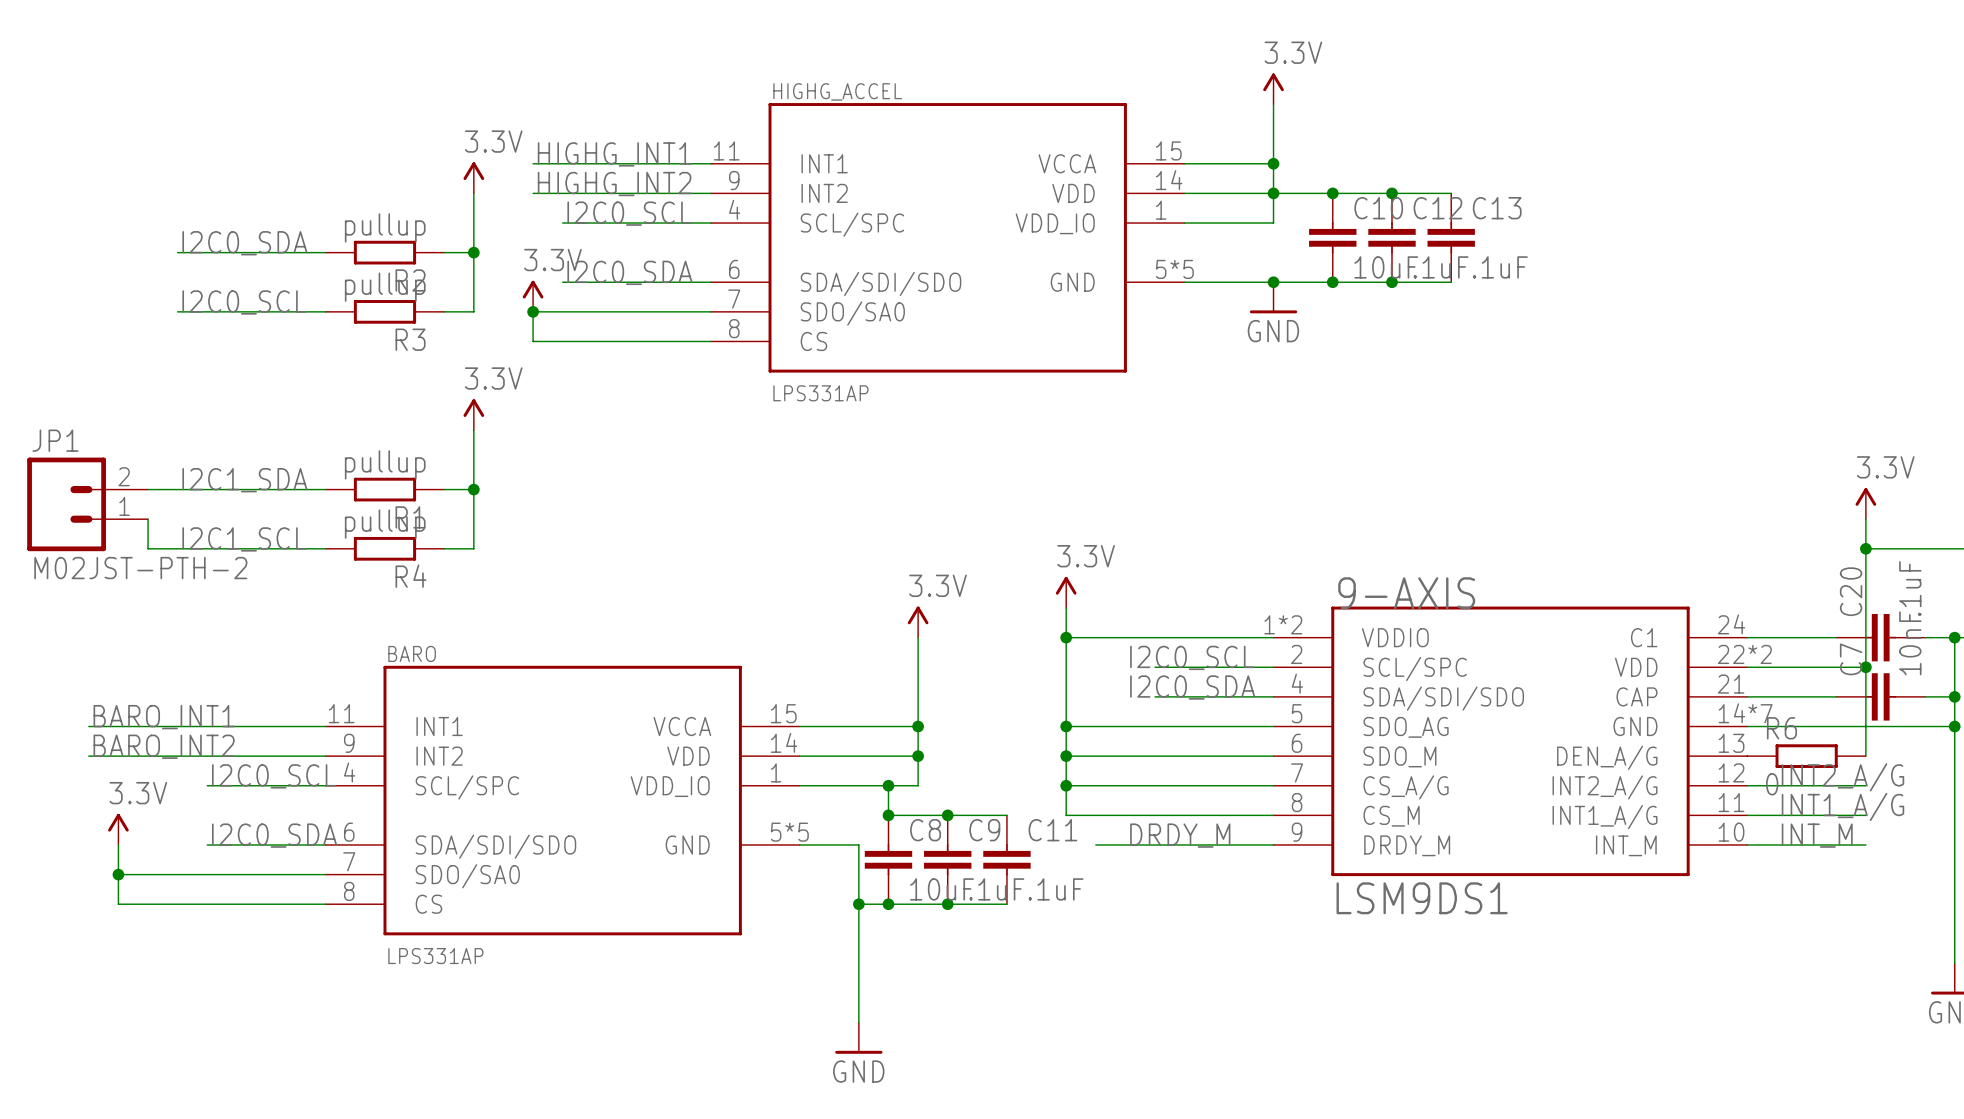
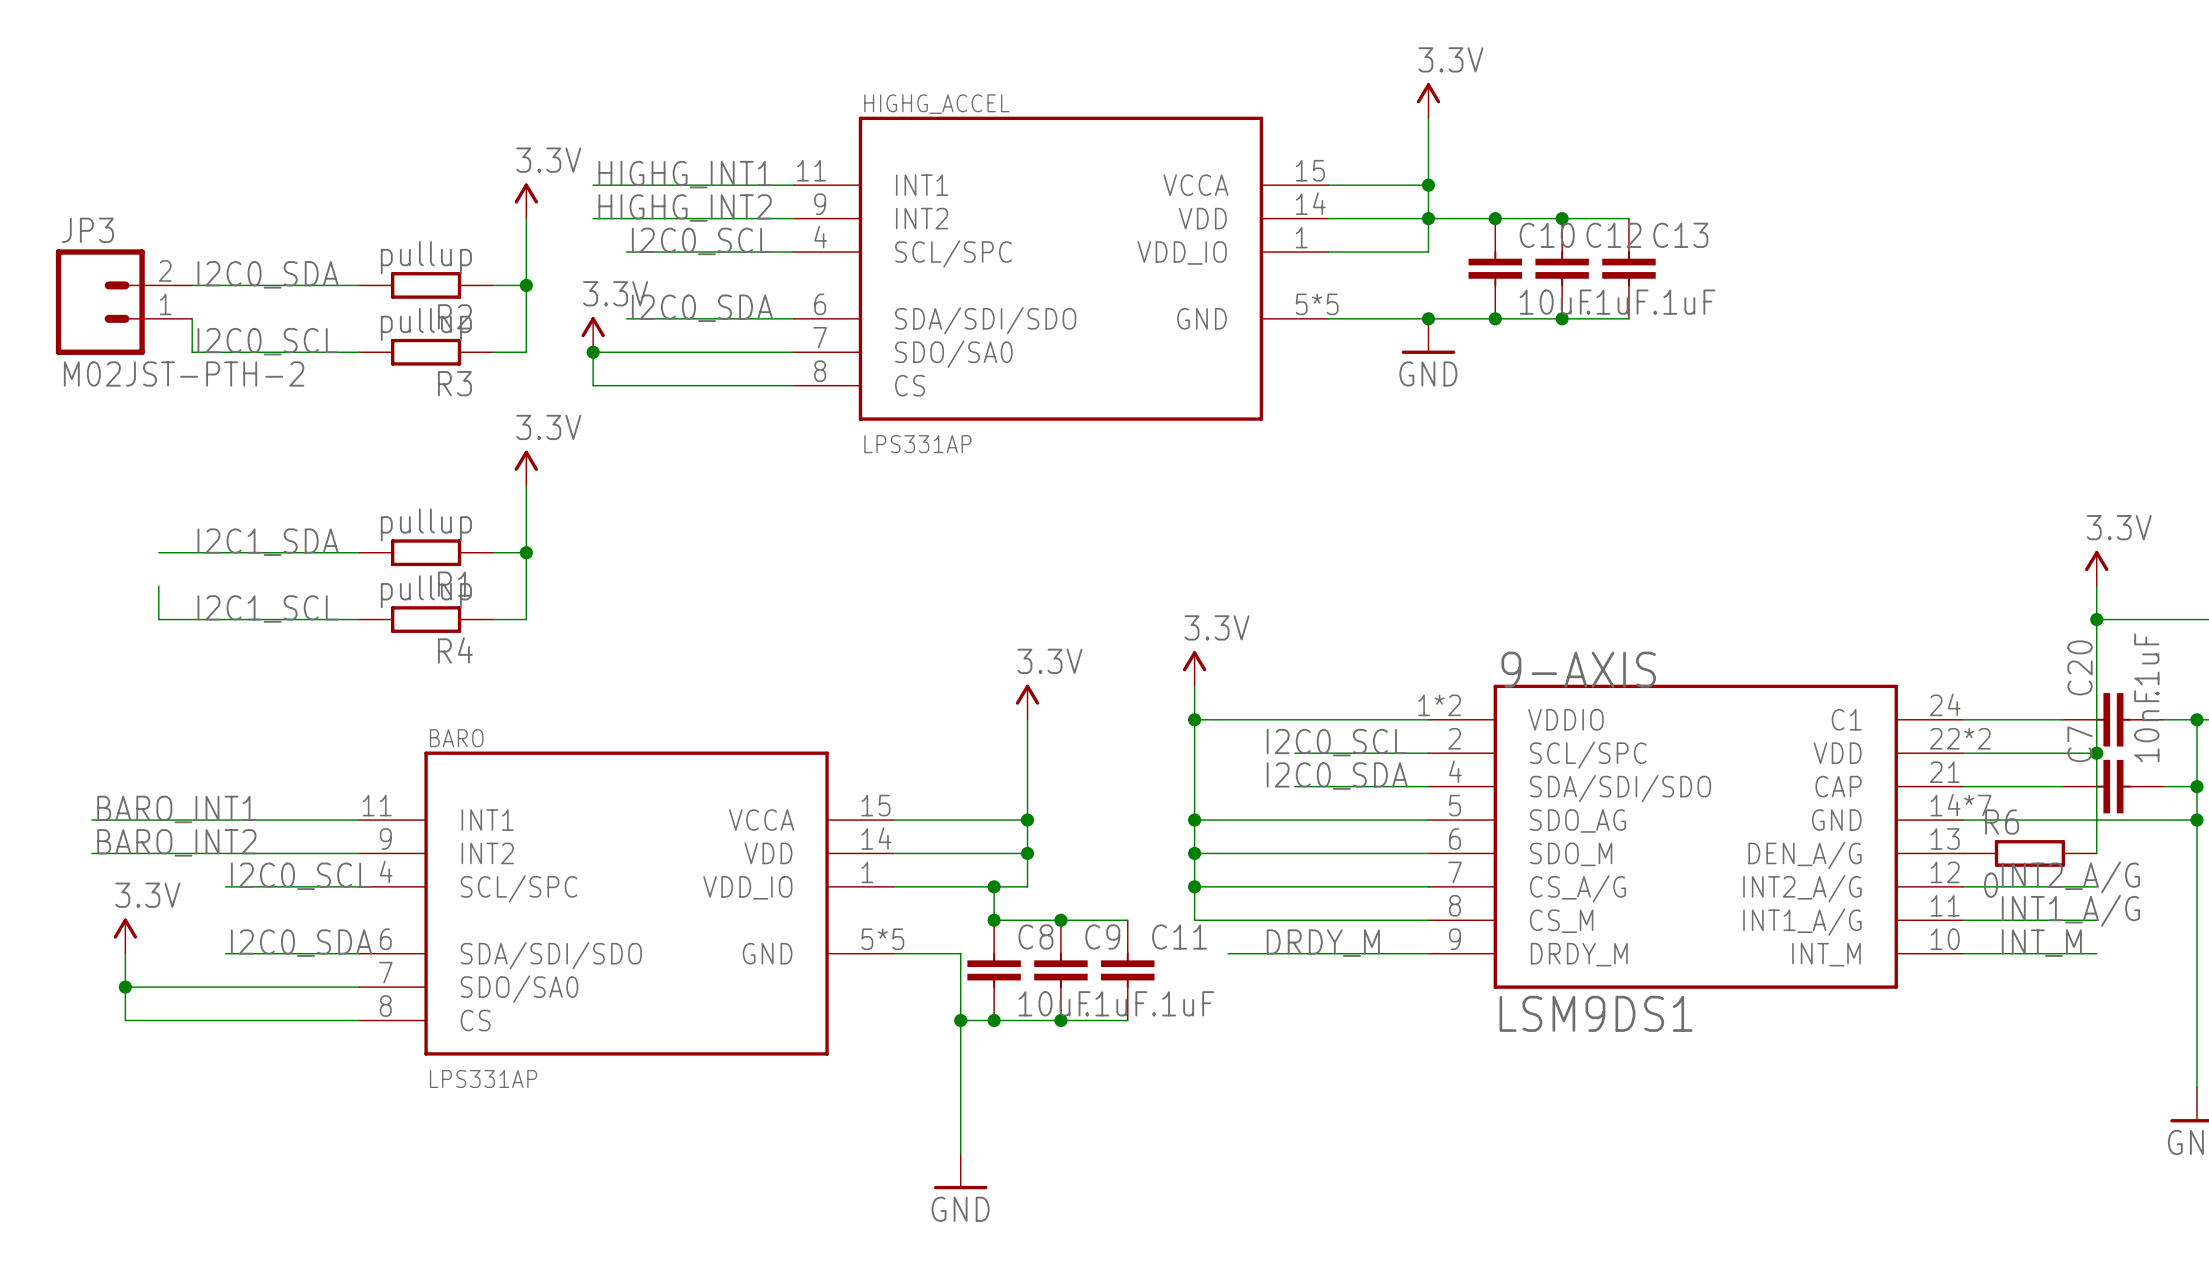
JP3: none -> M02JST-PTH-2 (124, 302)
wire: none -> (192, 318) (192, 352)
JP1: M02JST-PTH-2 (87, 504) -> none

